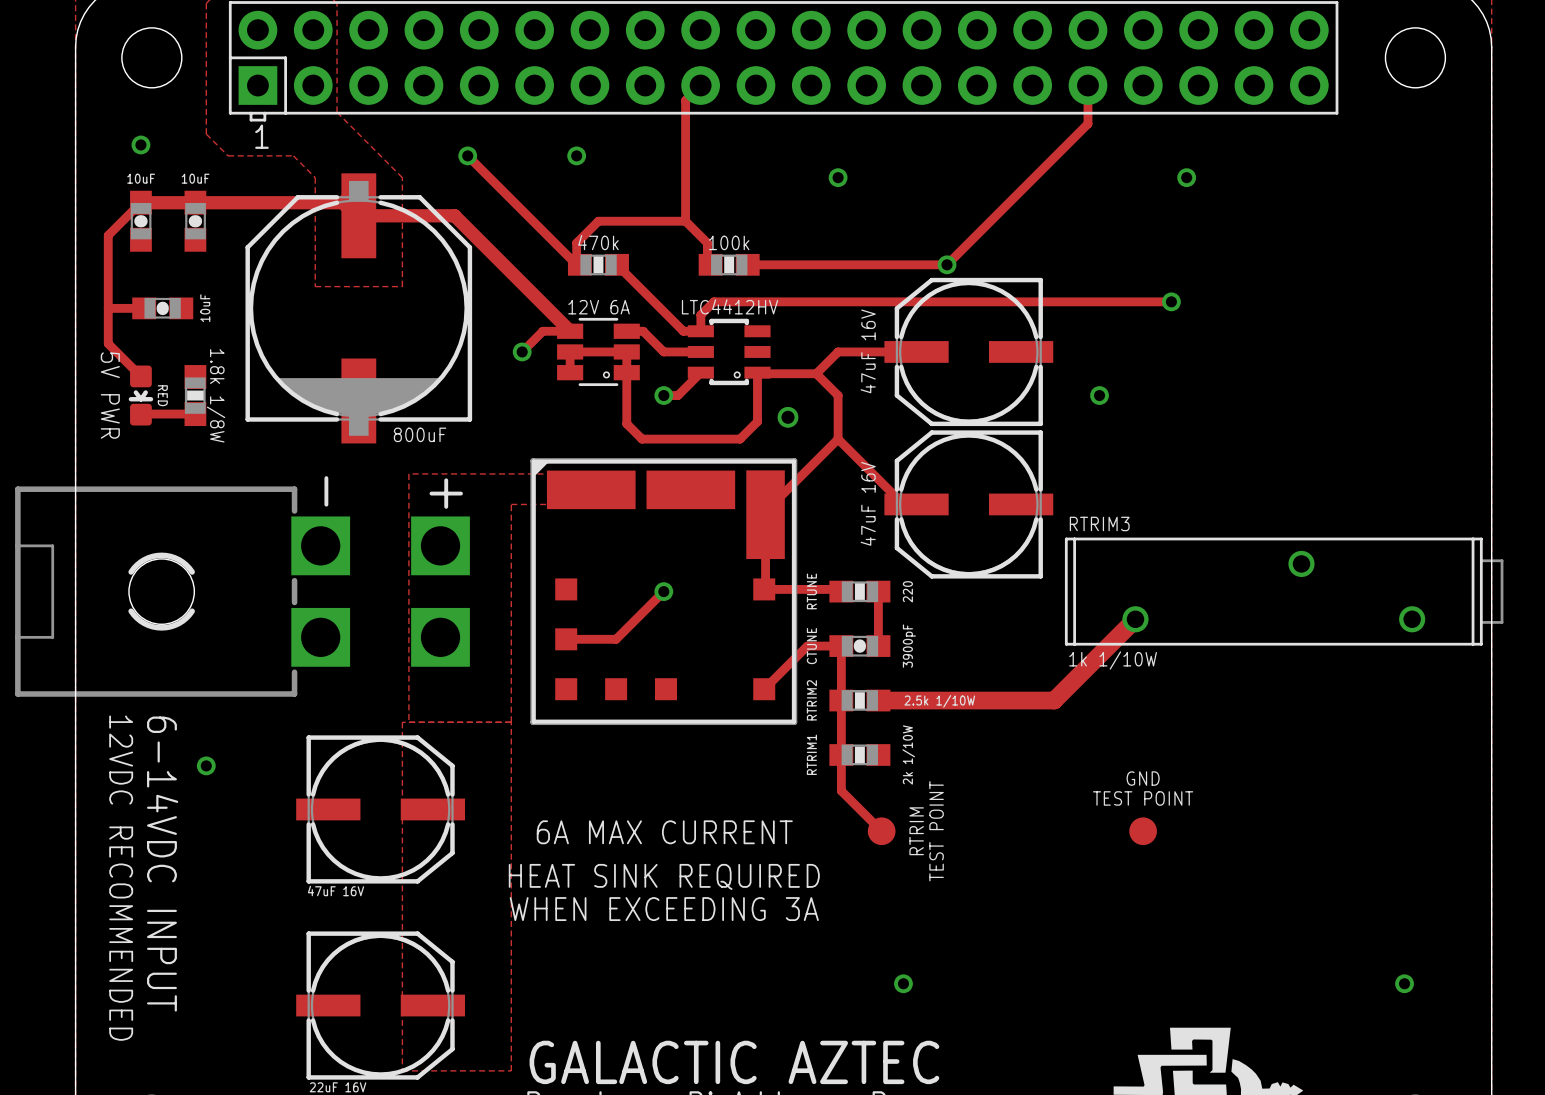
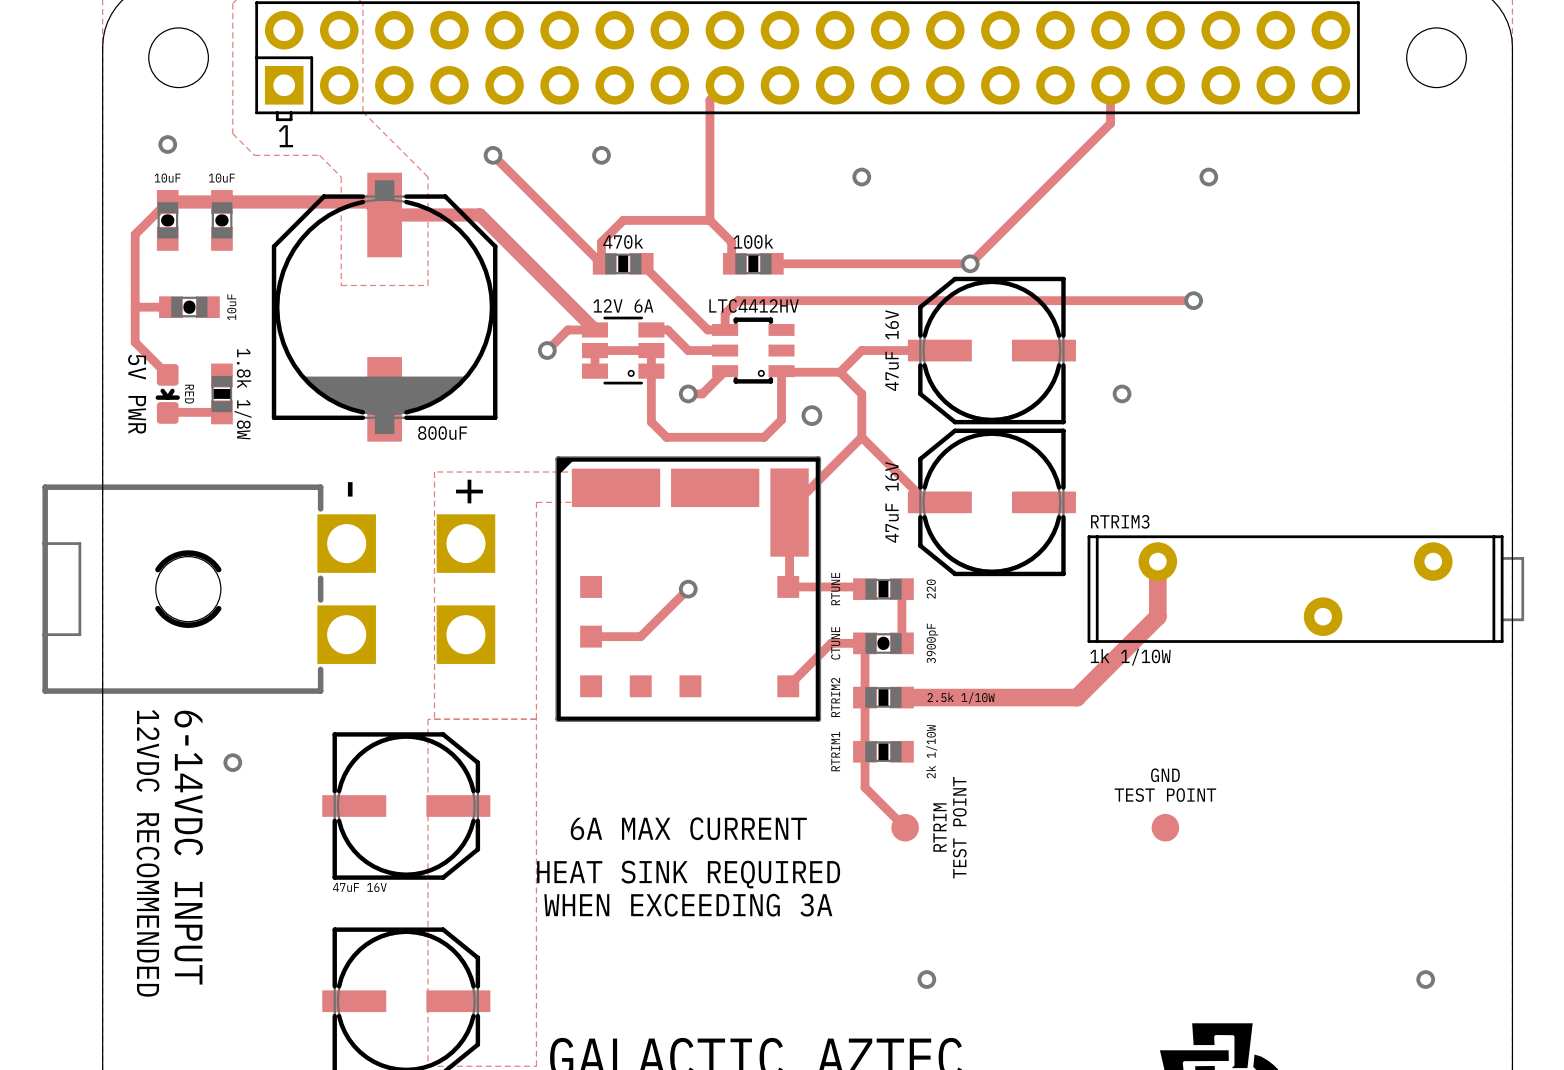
RTRIM3 footprint: [1064, 537, 1504, 646] -> [1087, 535, 1525, 643]
track: none -> (1157, 561) (1157, 616)

